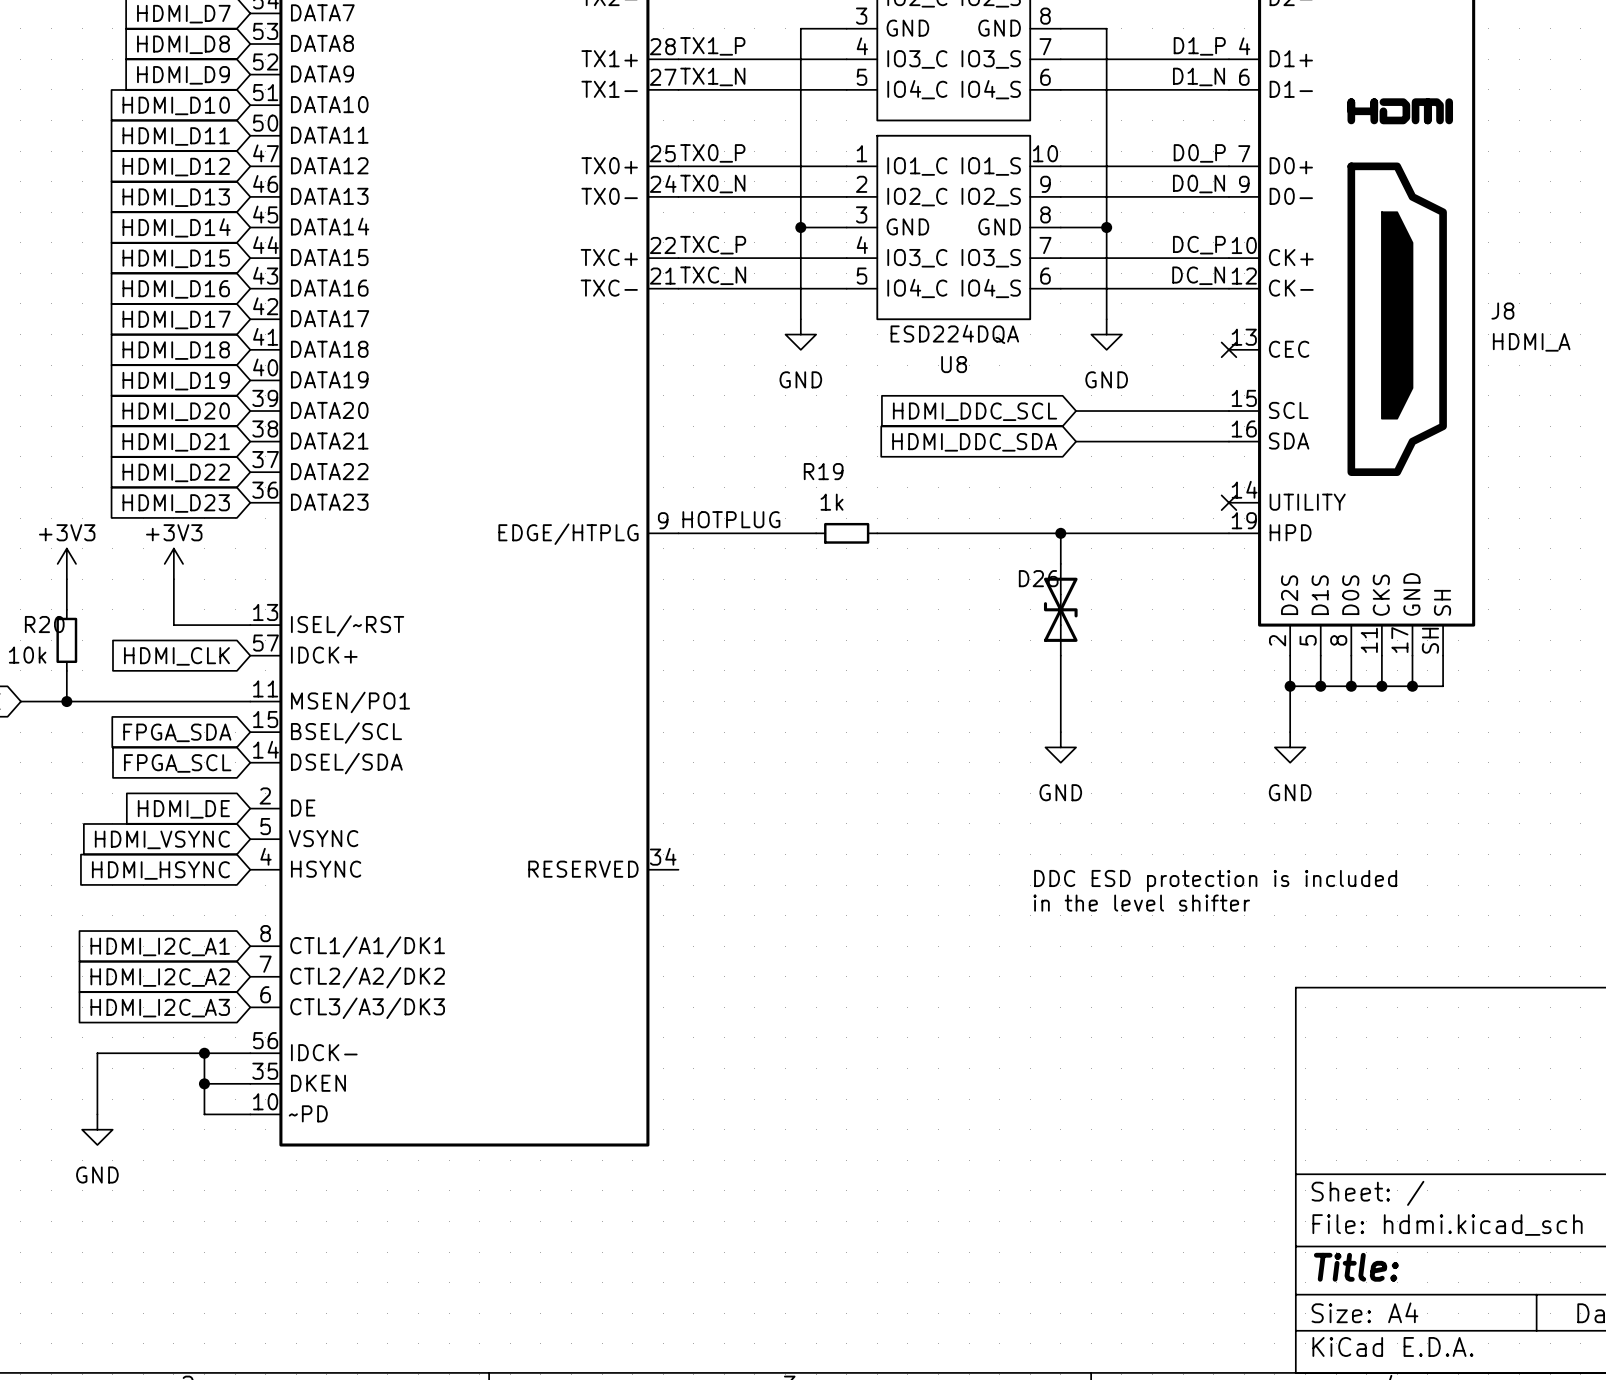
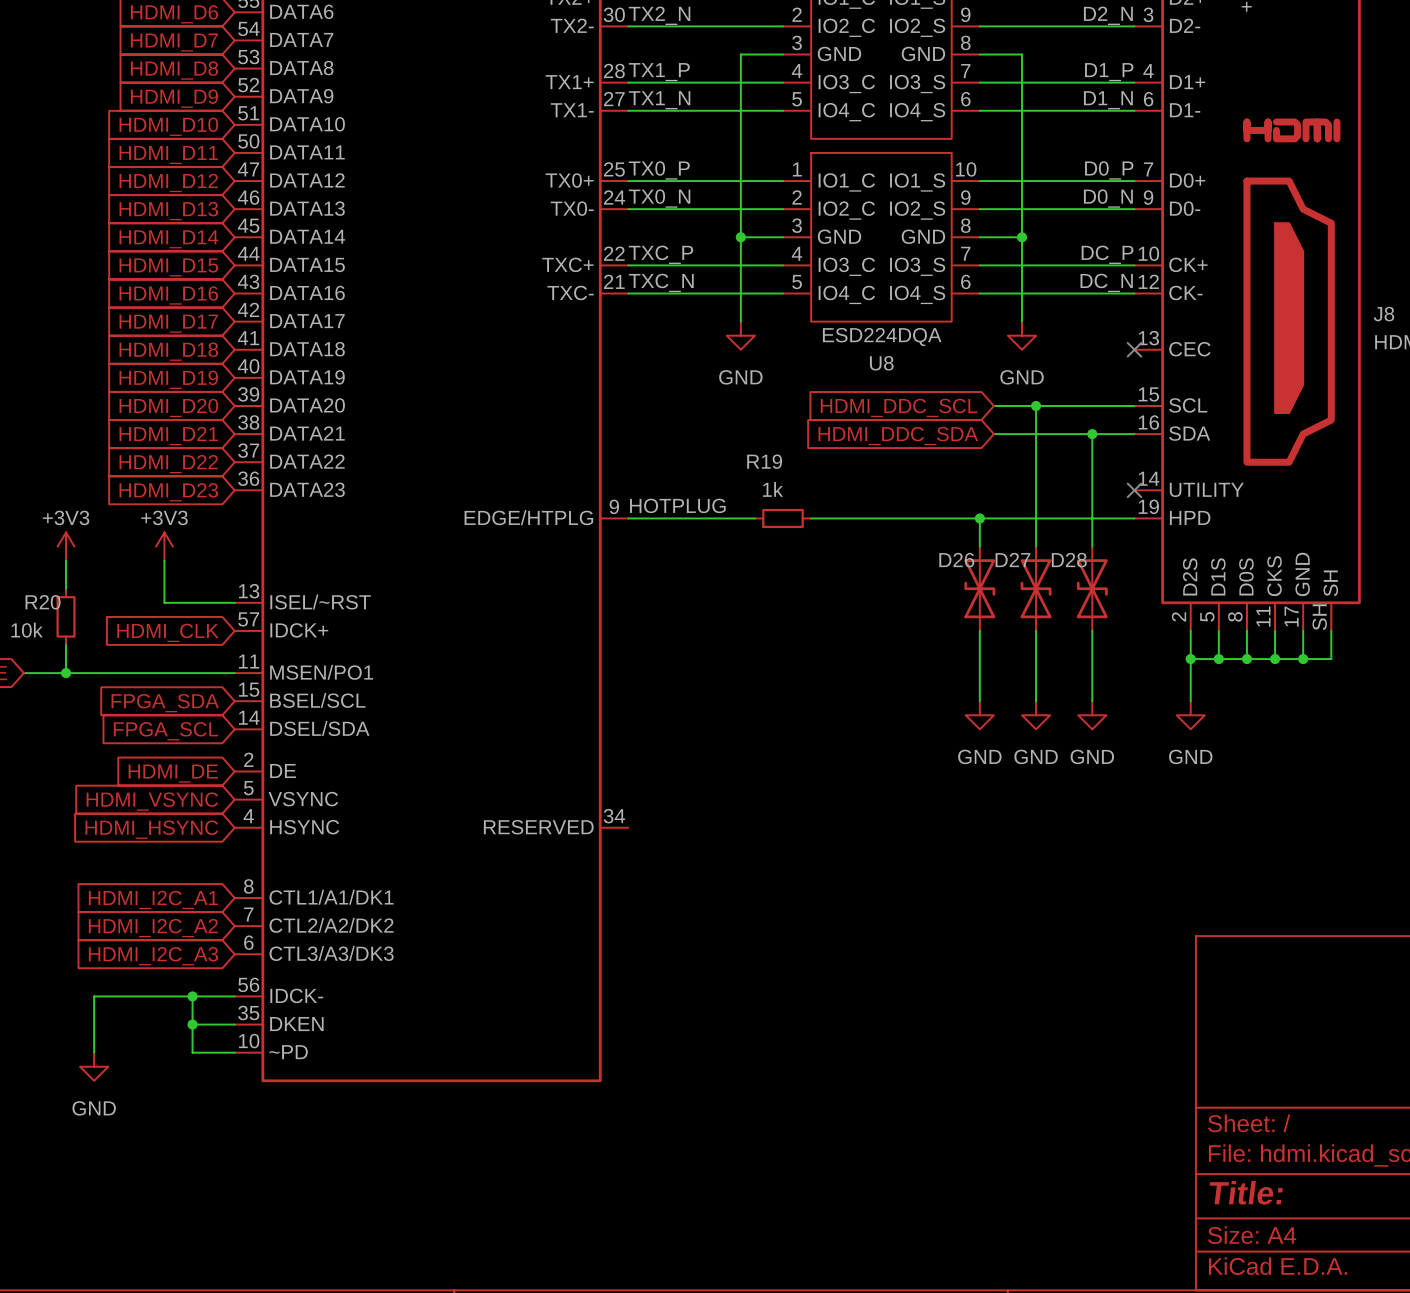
wire: none -> (1036, 405) (1036, 546)
junction: none -> (1036, 405)
wire: none -> (1092, 434) (1092, 546)
junction: none -> (1092, 434)
D27: none -> (1036, 588)
D28: none -> (1092, 588)
wire: none -> (1036, 630) (1036, 701)
wire: none -> (1092, 630) (1092, 701)
power symbol: none -> GND (1036, 715)
power symbol: none -> GND (1092, 715)
text: DDC ESD protection is included (1215, 881) -> none
text: in the level shifter (1141, 903) -> none

